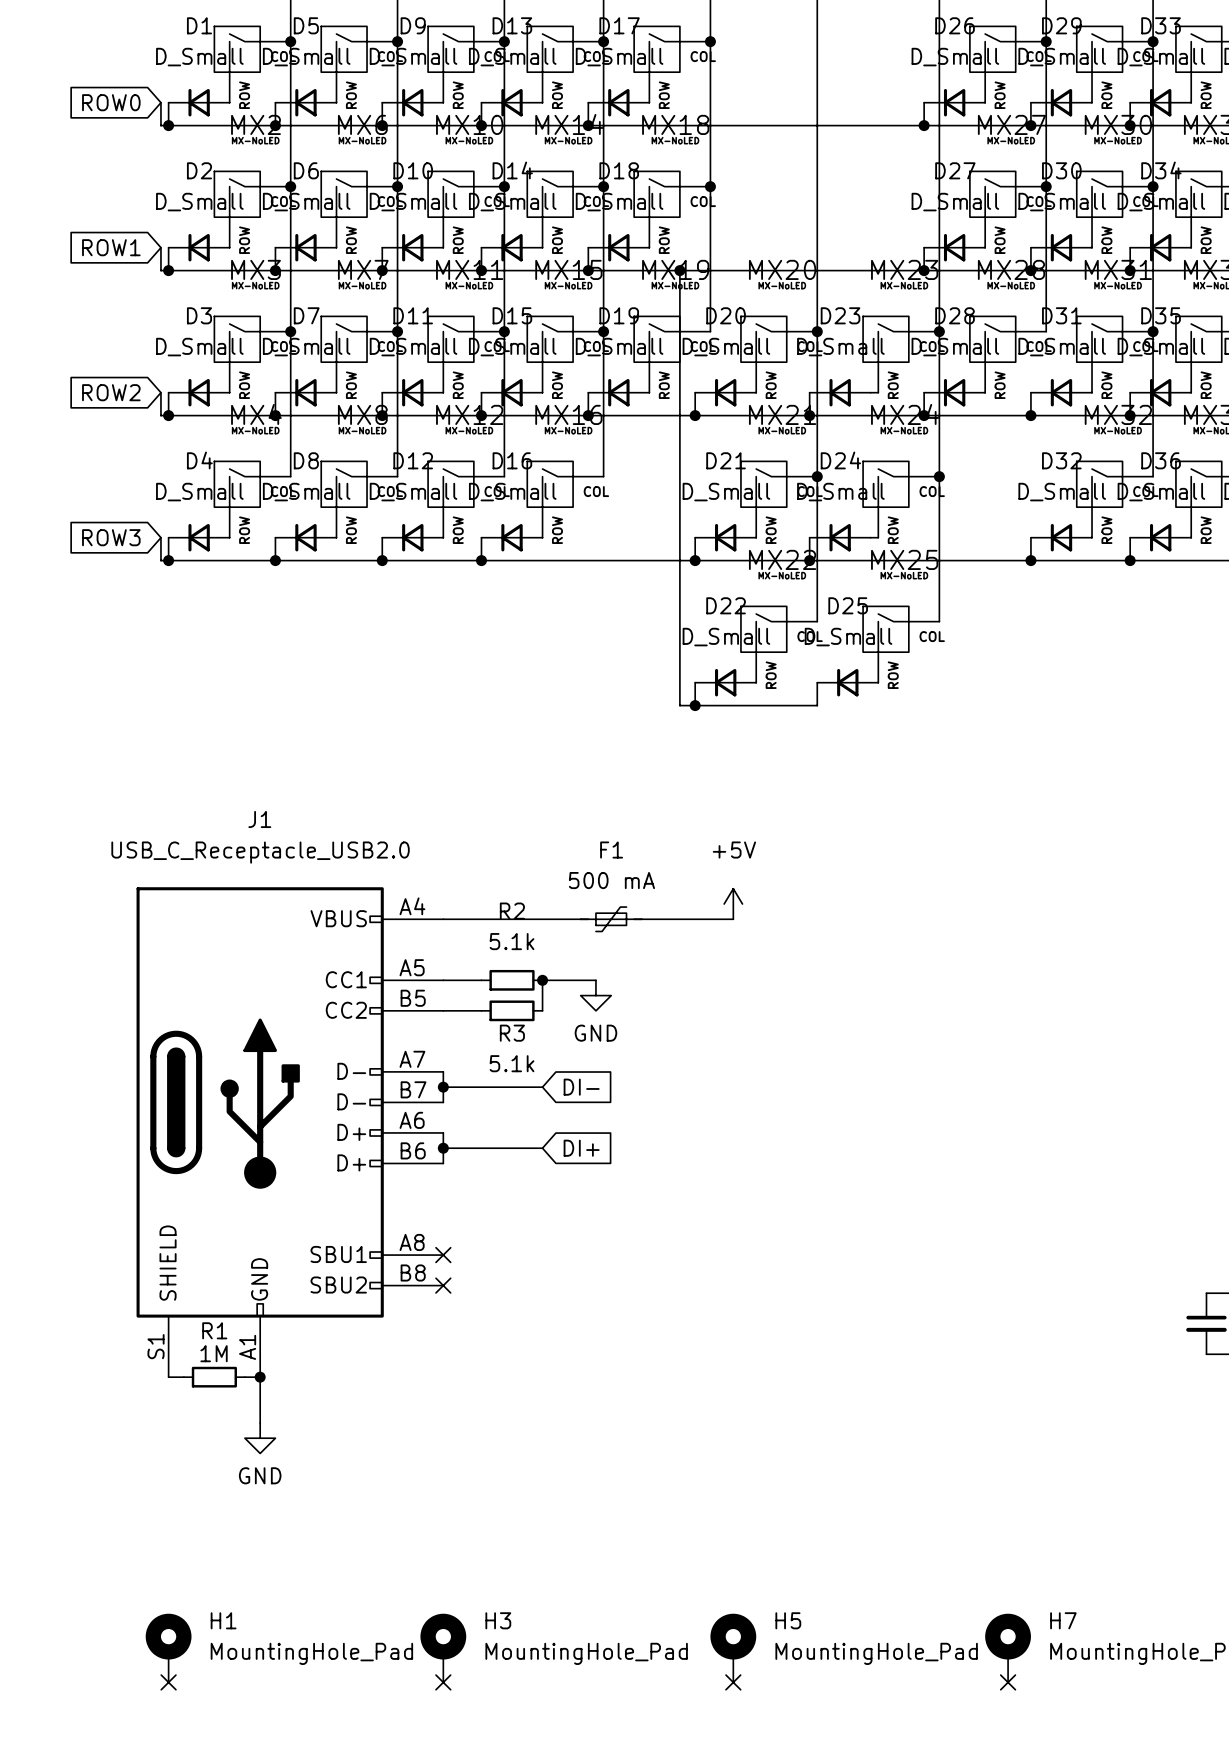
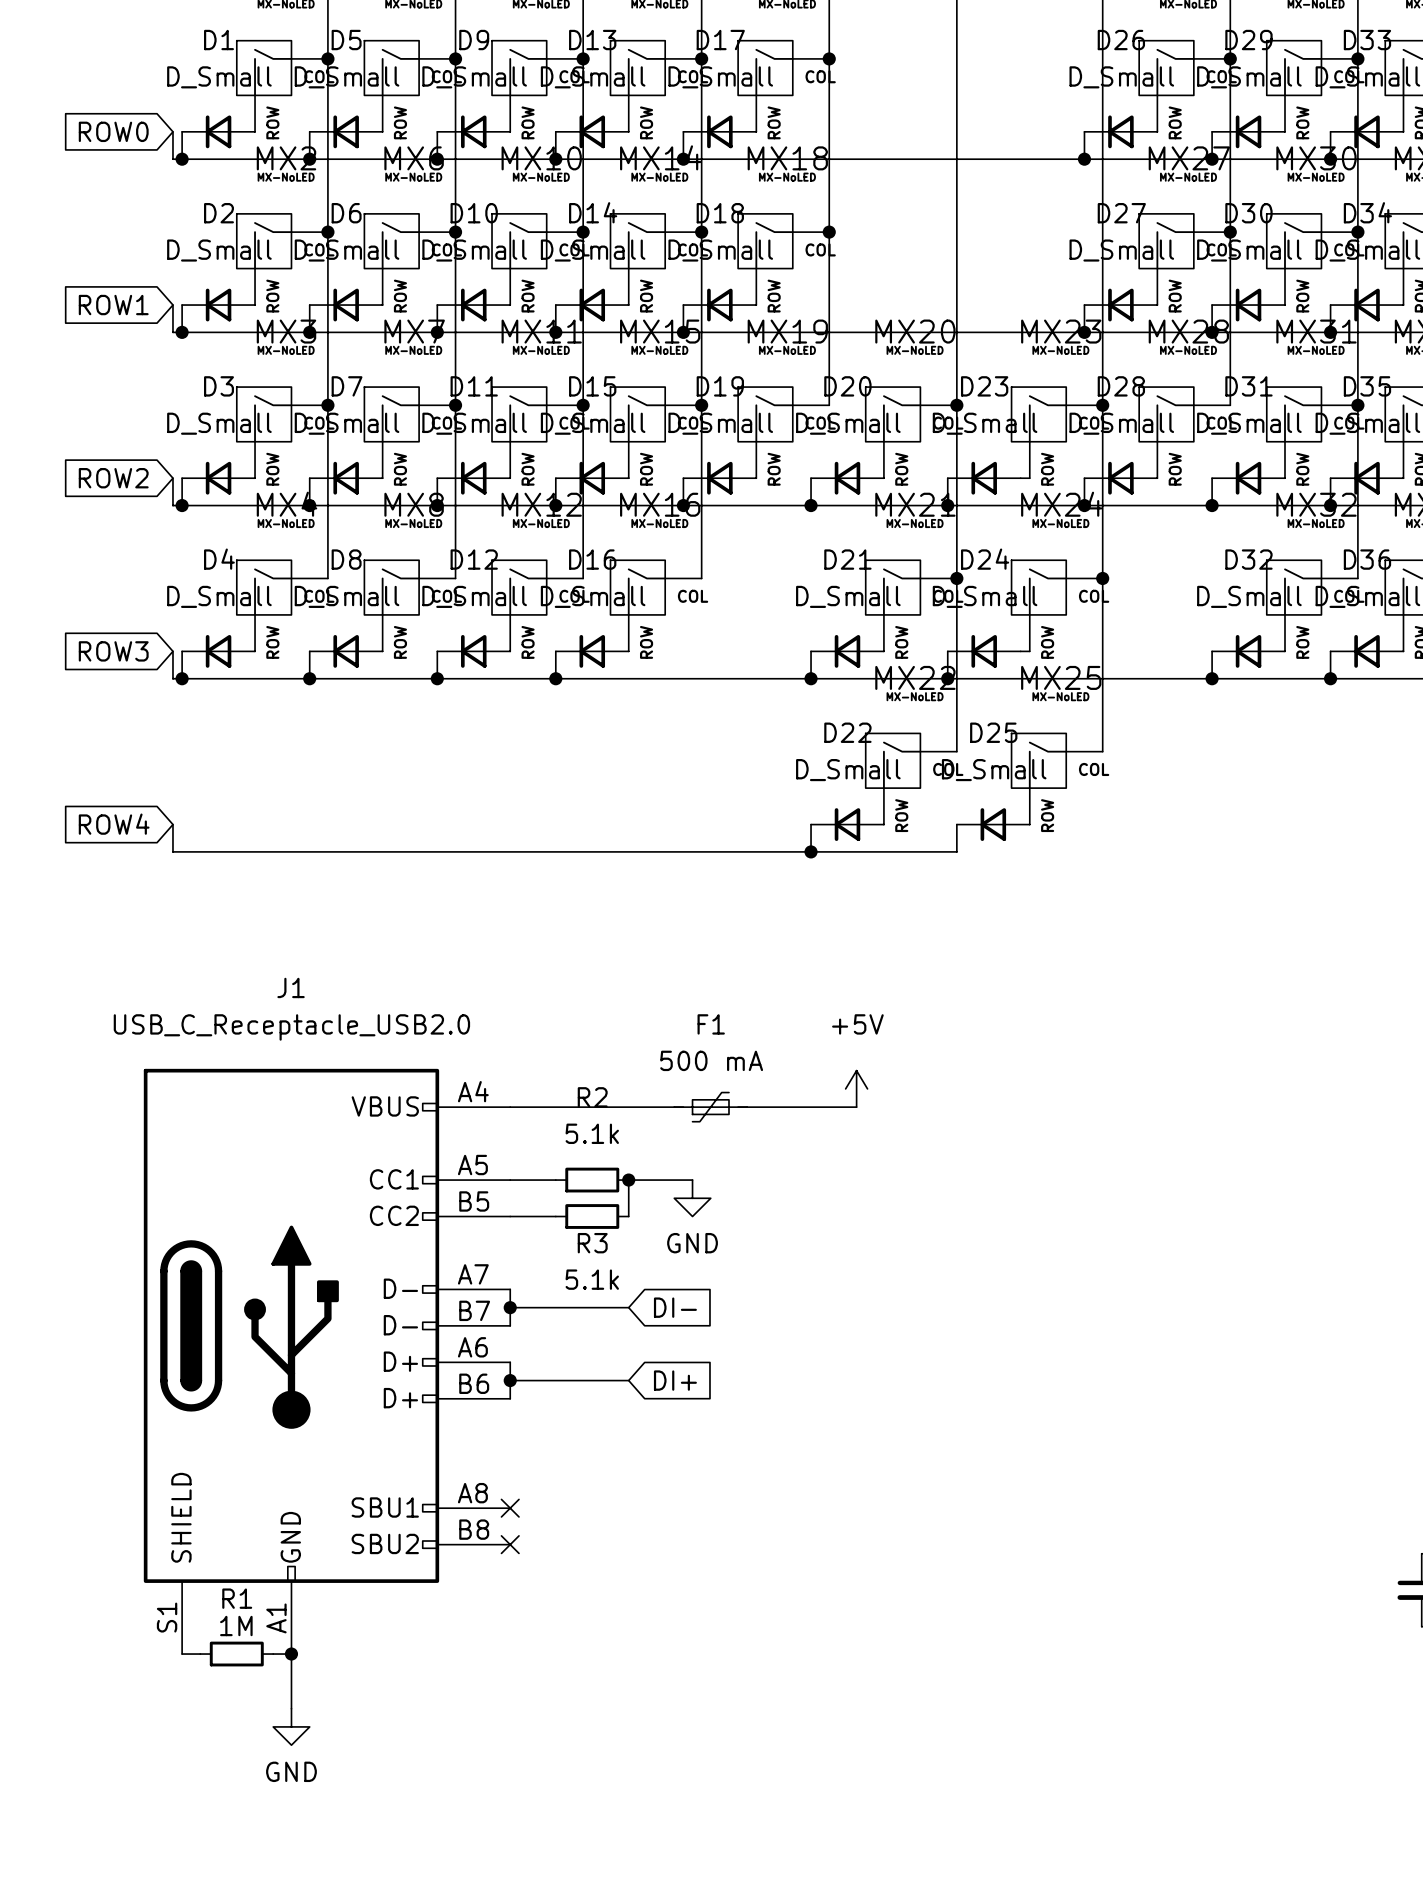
wire: (679, 270) (679, 705) -> (172, 824) (172, 851) (792, 851)
junction: (679, 270) -> none
global label: none -> ROW4 (114, 824)

